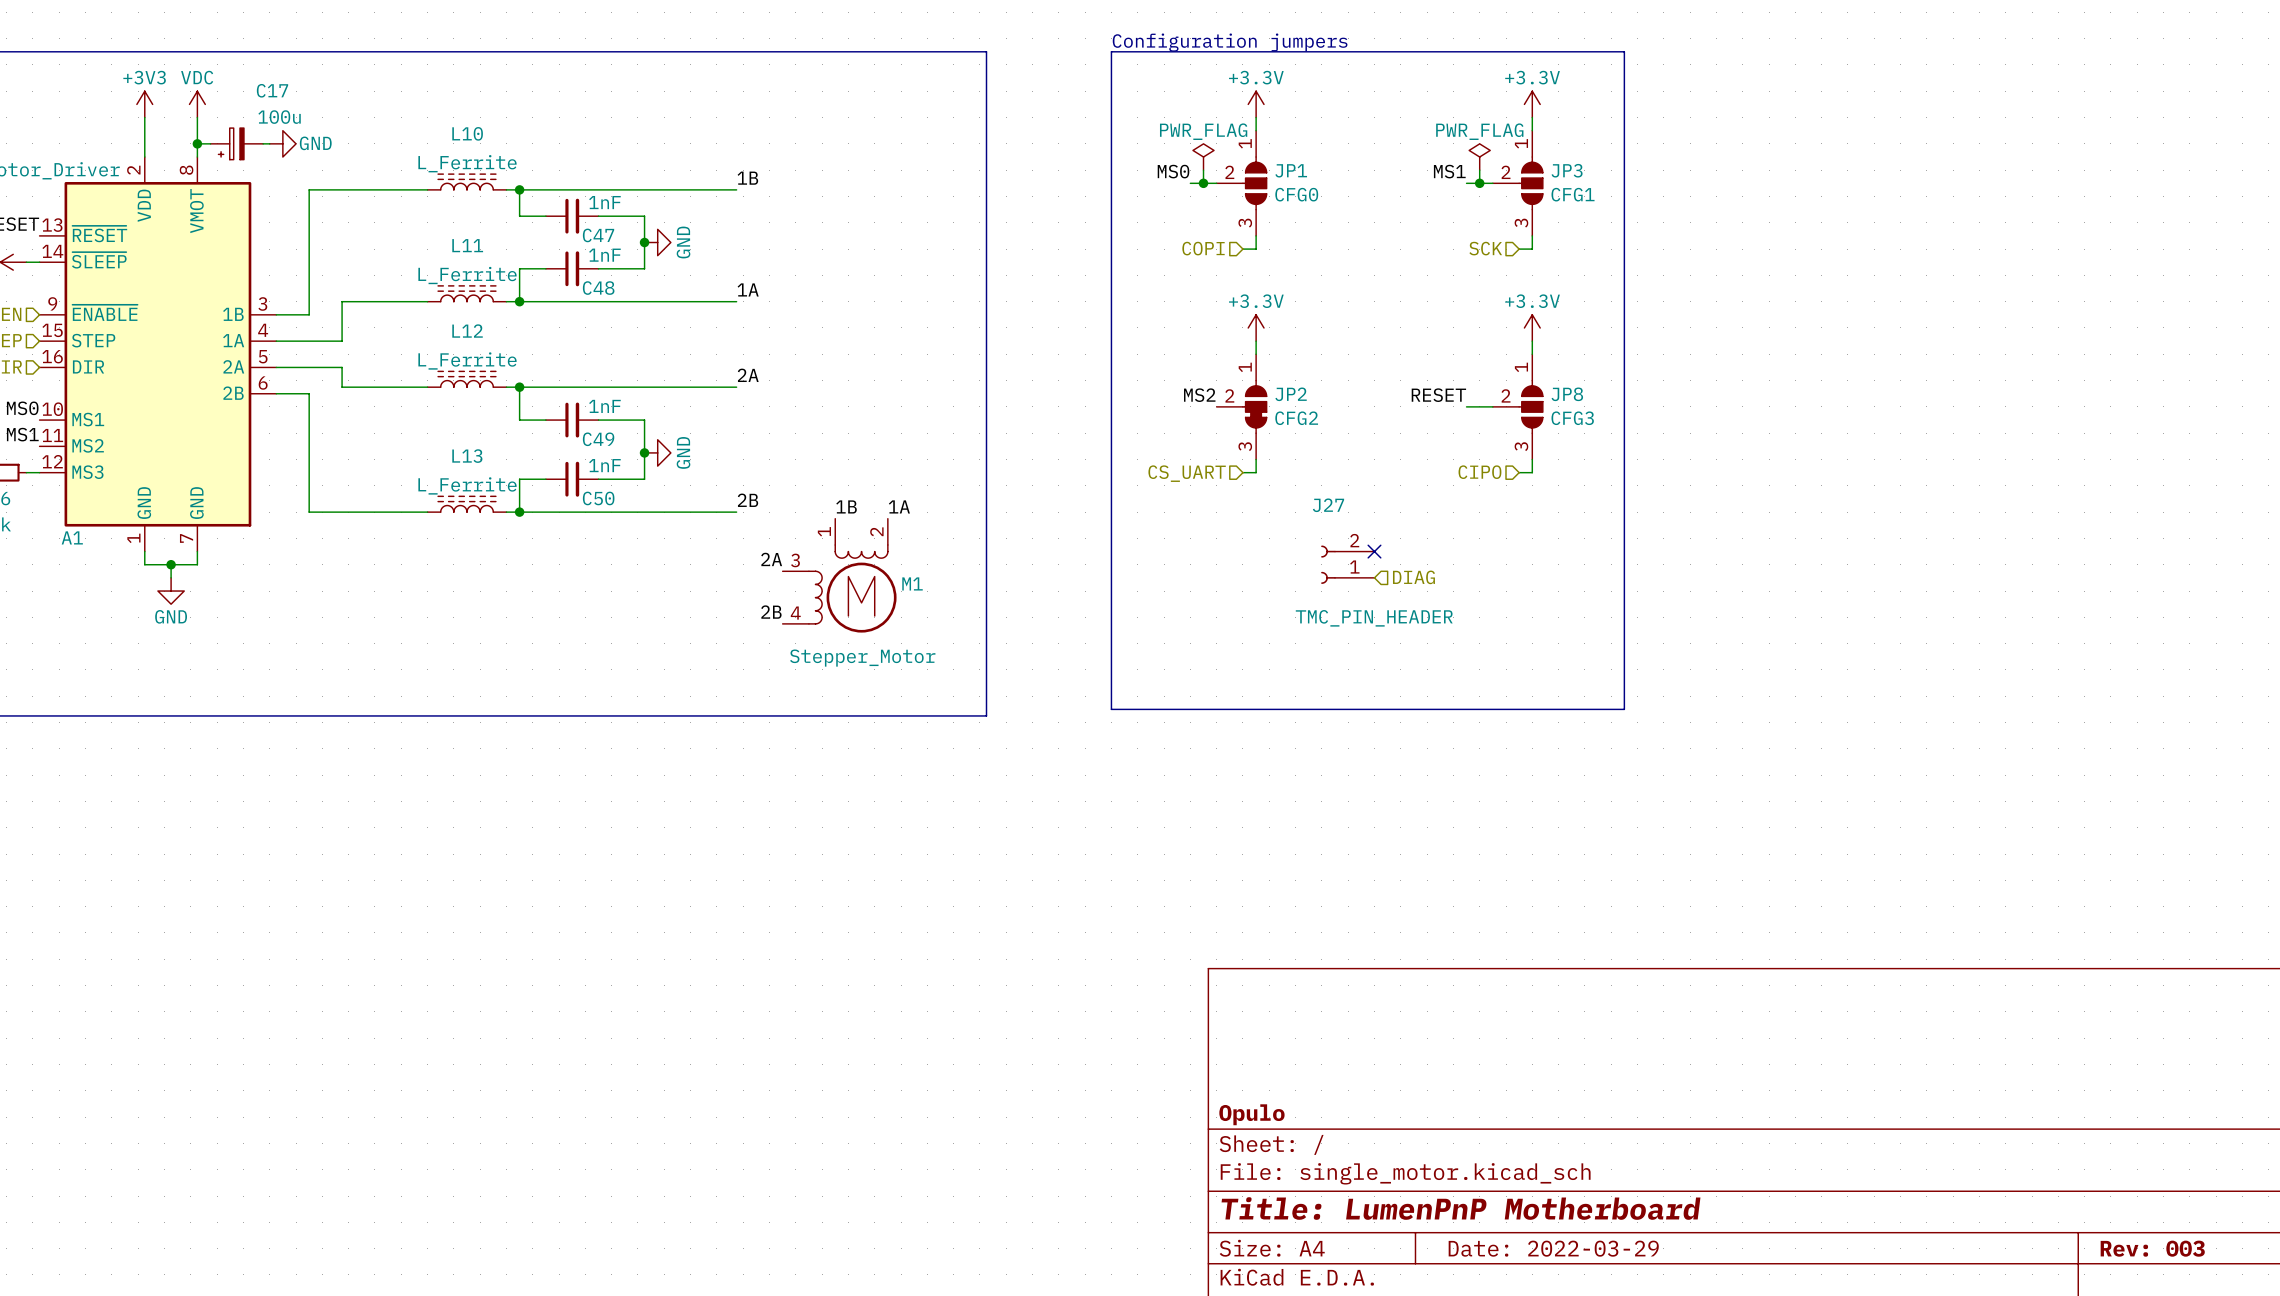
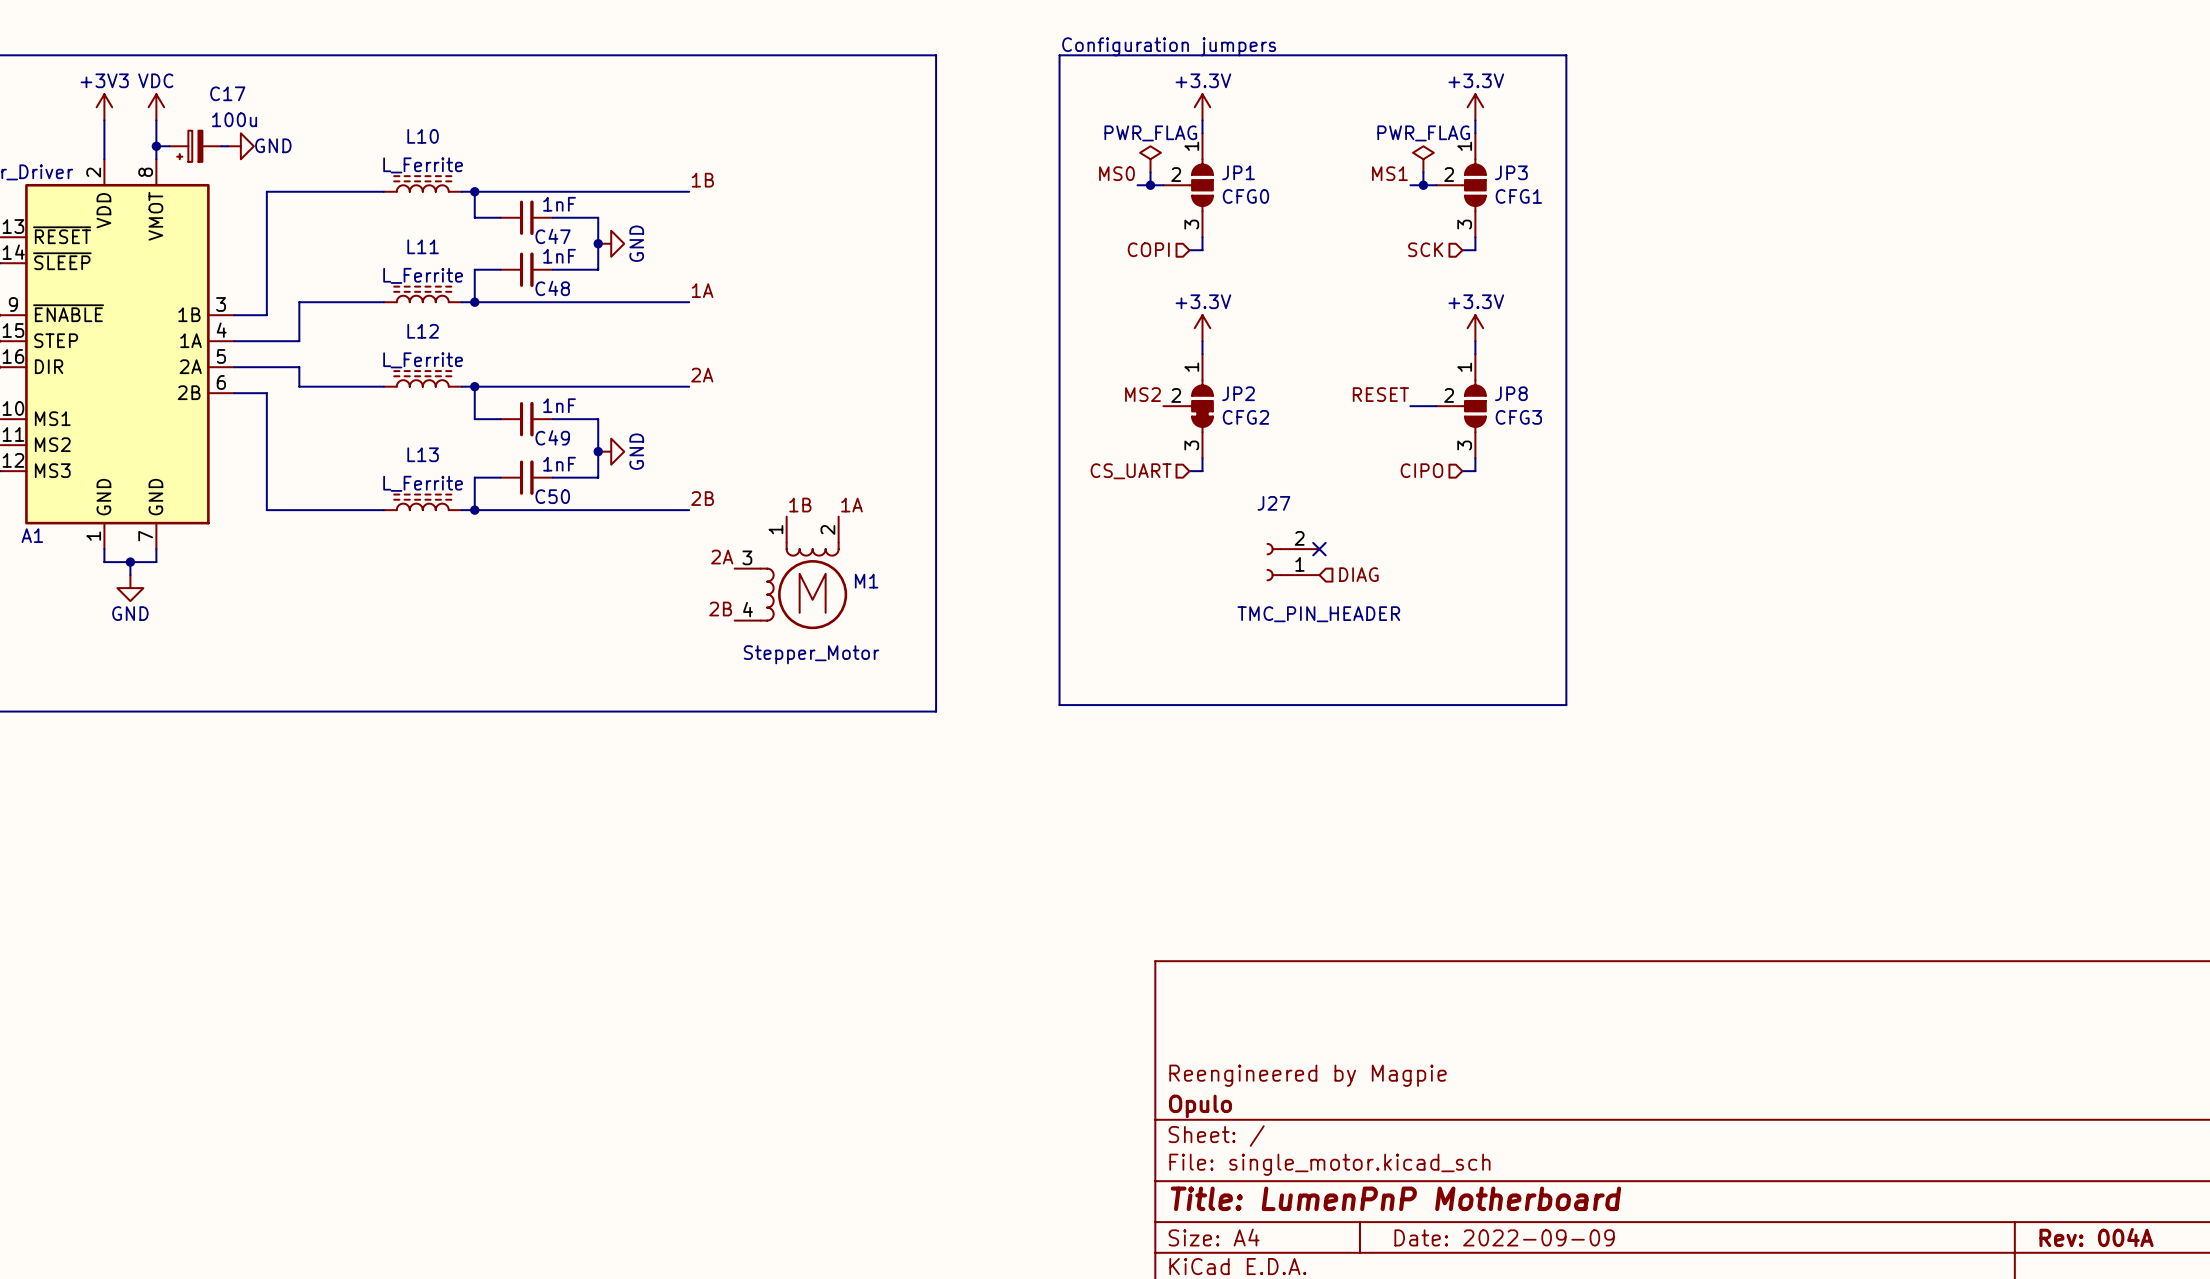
title block: none -> Reengineered by Magpie (1308, 1075)
title block: Date: 2022-03-29 (1553, 1248) -> Date: 2022-09-09 (1504, 1237)
title block: Rev: 003 (2152, 1248) -> Rev: 004A (2096, 1237)

